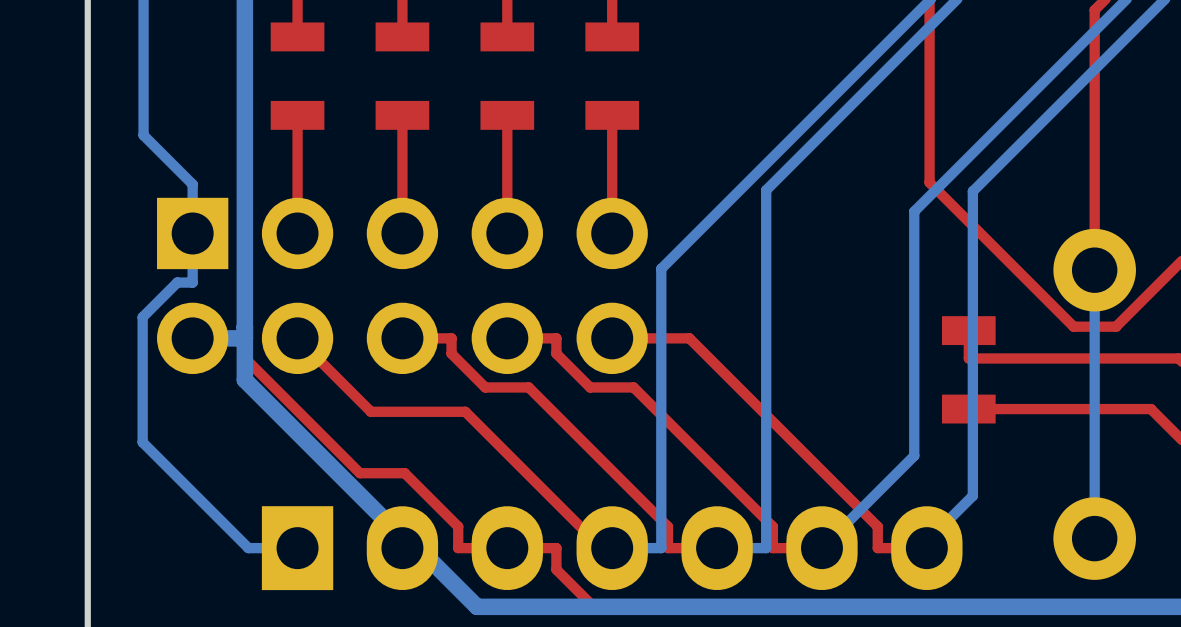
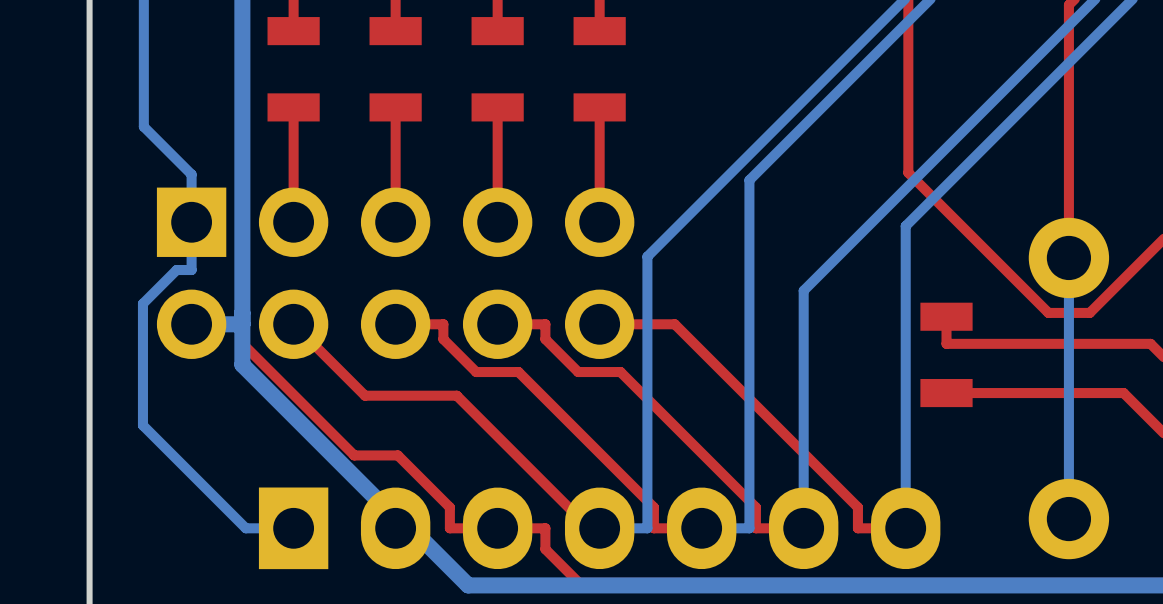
bottom track: (972, 191) (972, 495) (926, 541) -> (950, 181) (905, 226) (905, 522)
bottom track: (914, 211) (914, 455) (821, 548) -> (893, 200) (803, 290) (803, 528)

